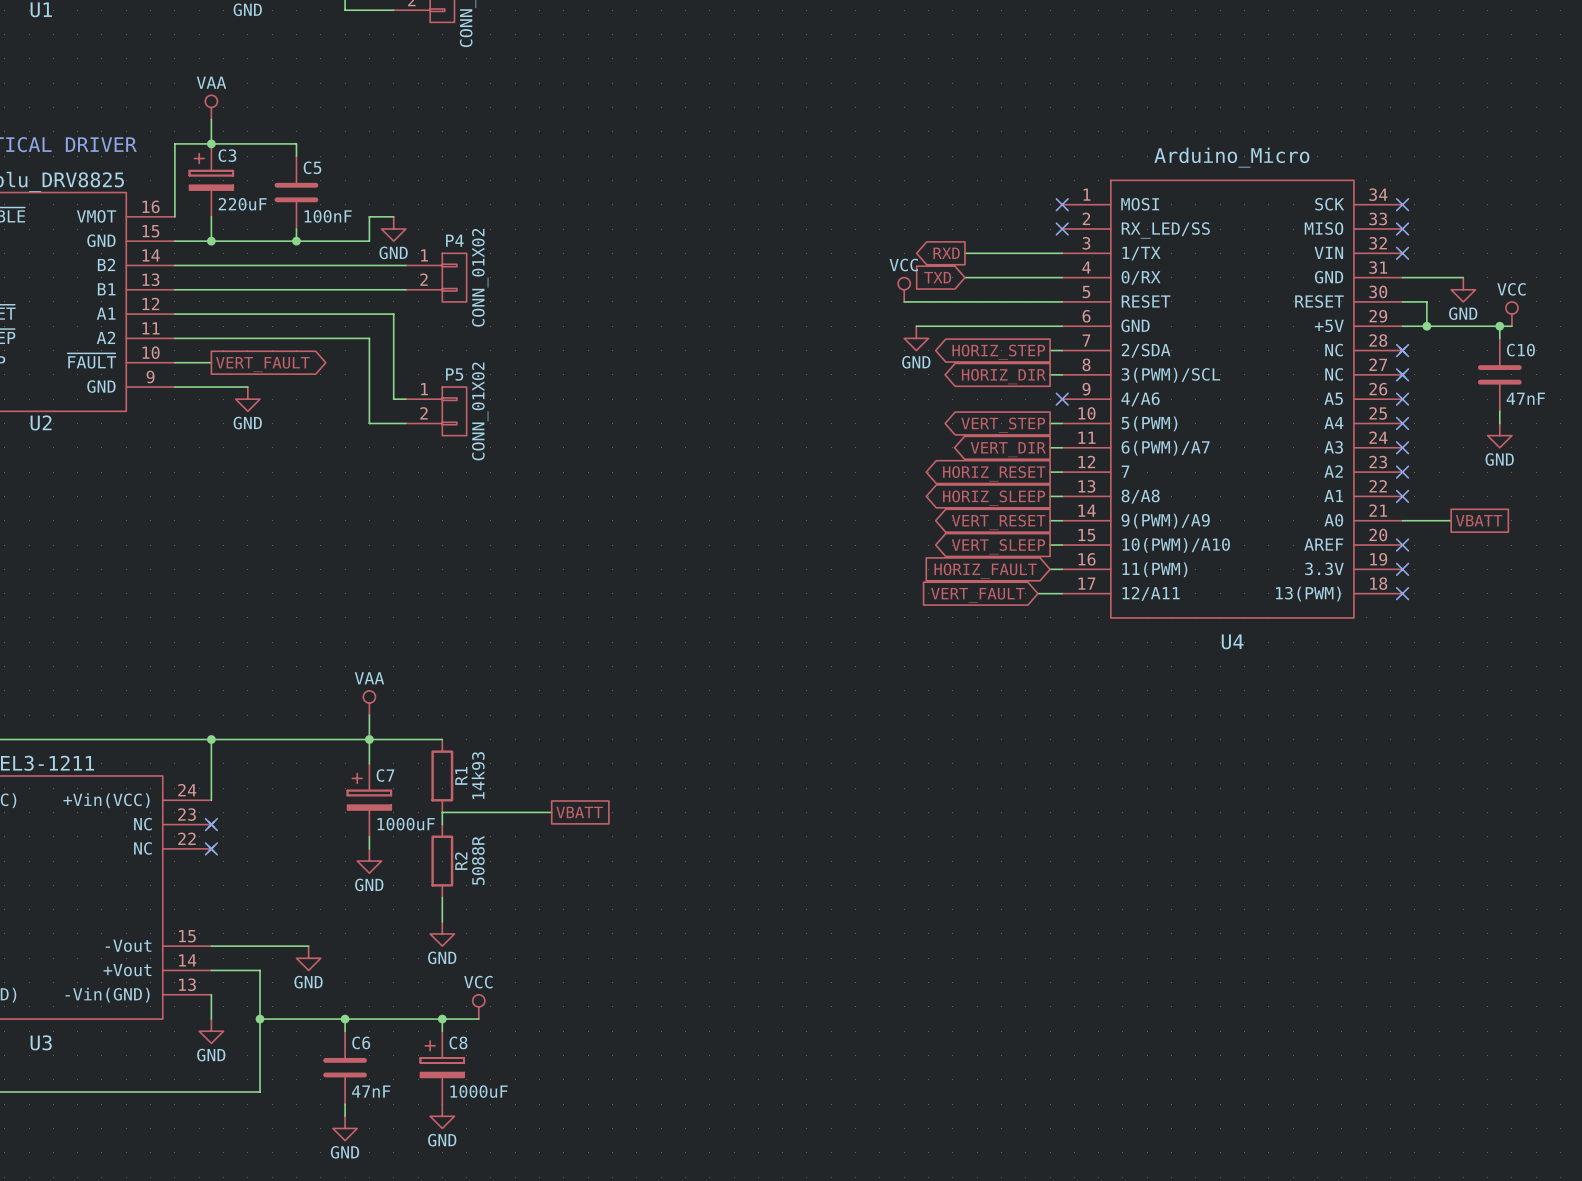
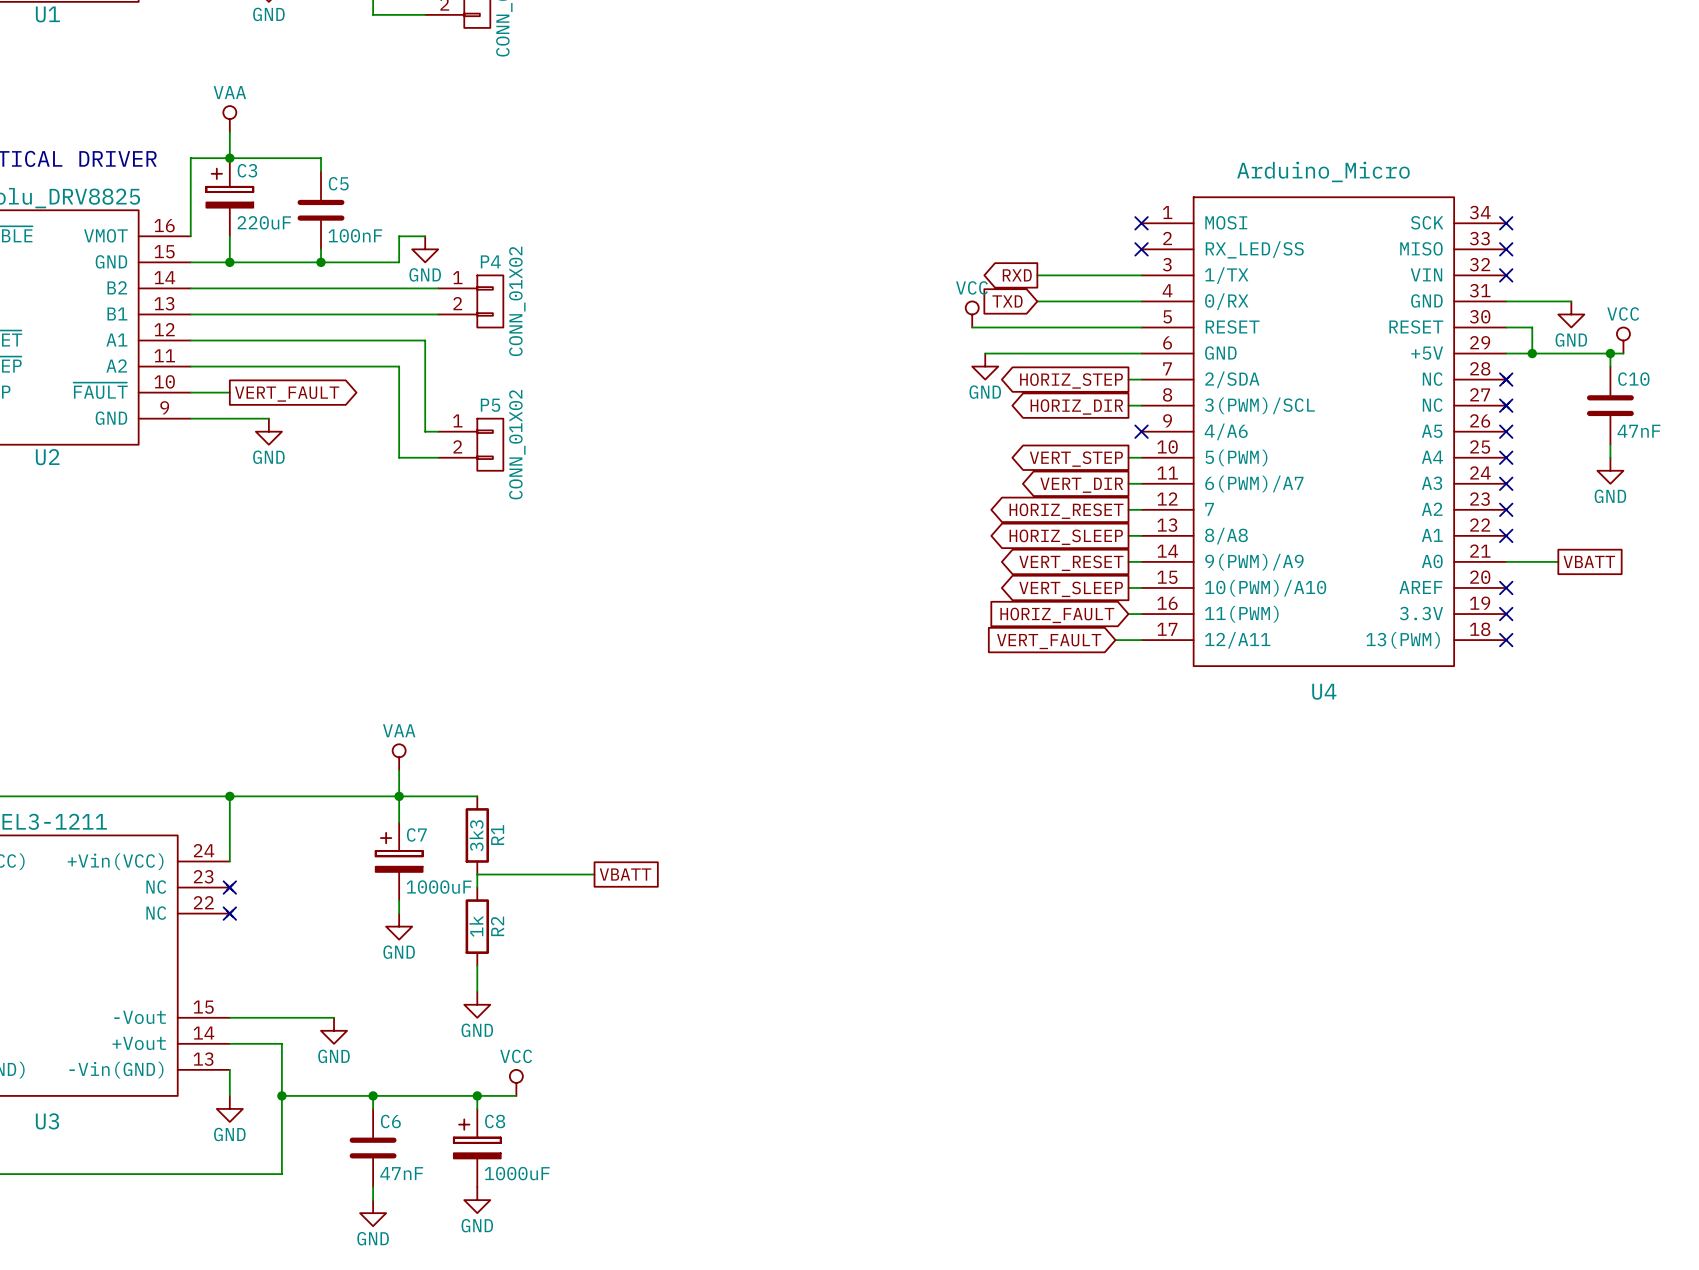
R1 value: 14k93 (478, 775) -> 3k3 (476, 835)
R2 value: 5088R (478, 860) -> 1k (476, 926)

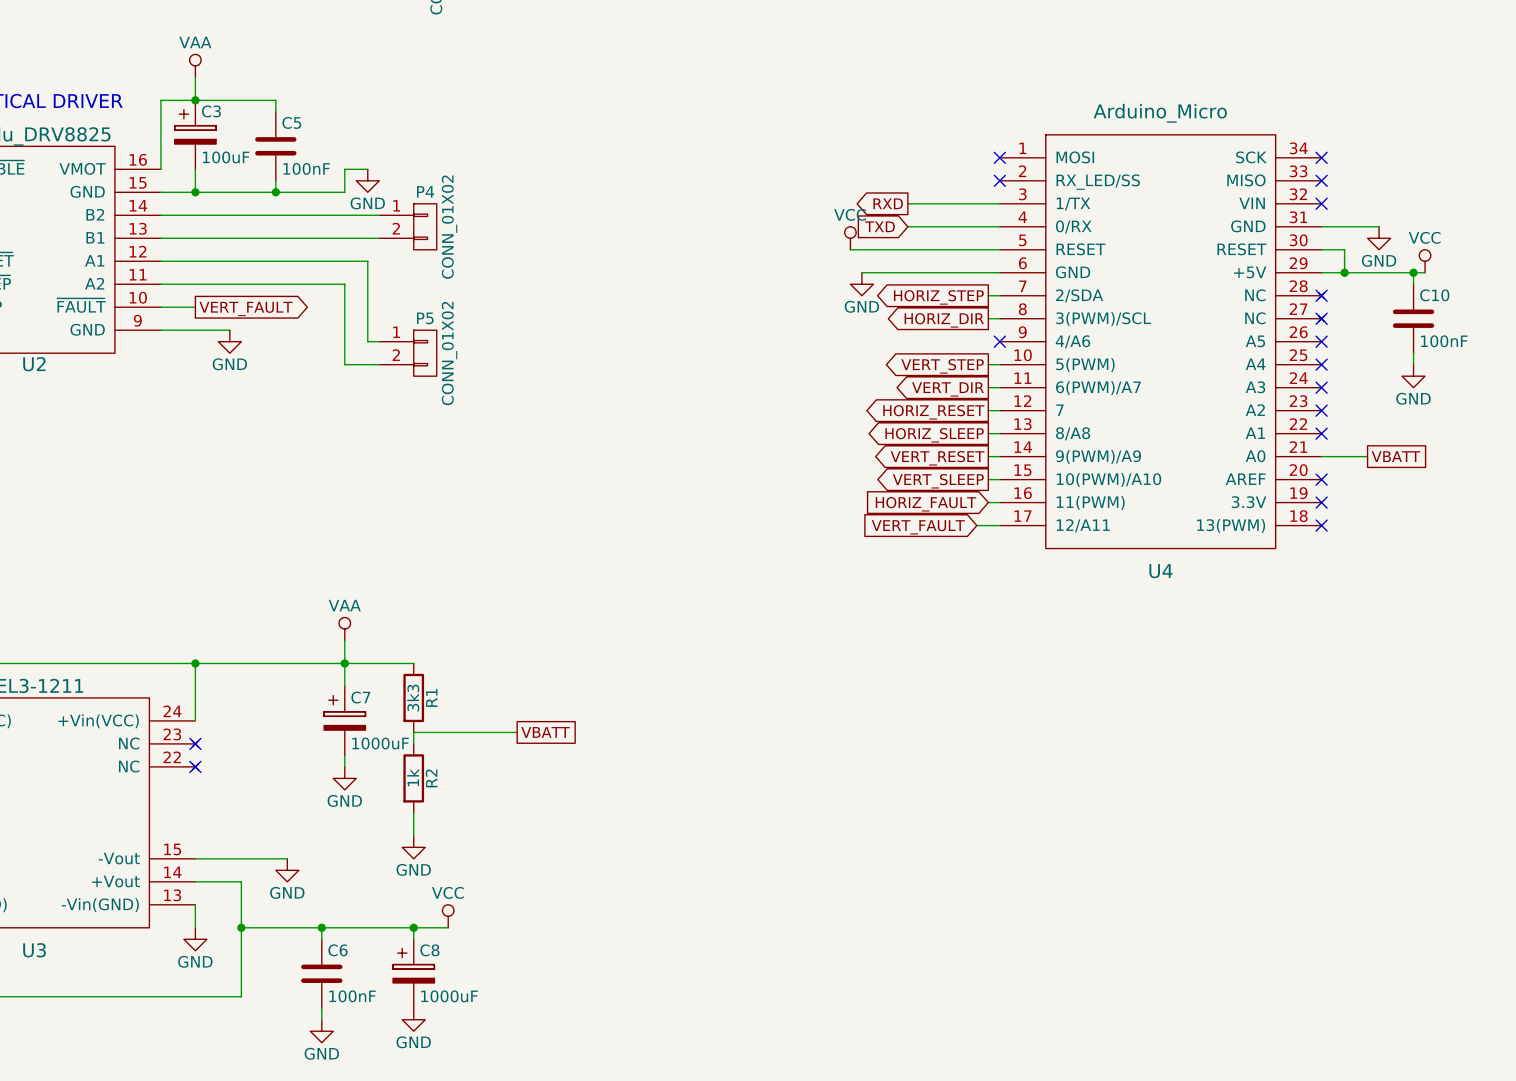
C3 value: 220uF (264, 222) -> 100uF (226, 157)
C10 value: 47nF (1638, 431) -> 100nF (1444, 341)
C6 value: 47nF (401, 1173) -> 100nF (352, 996)

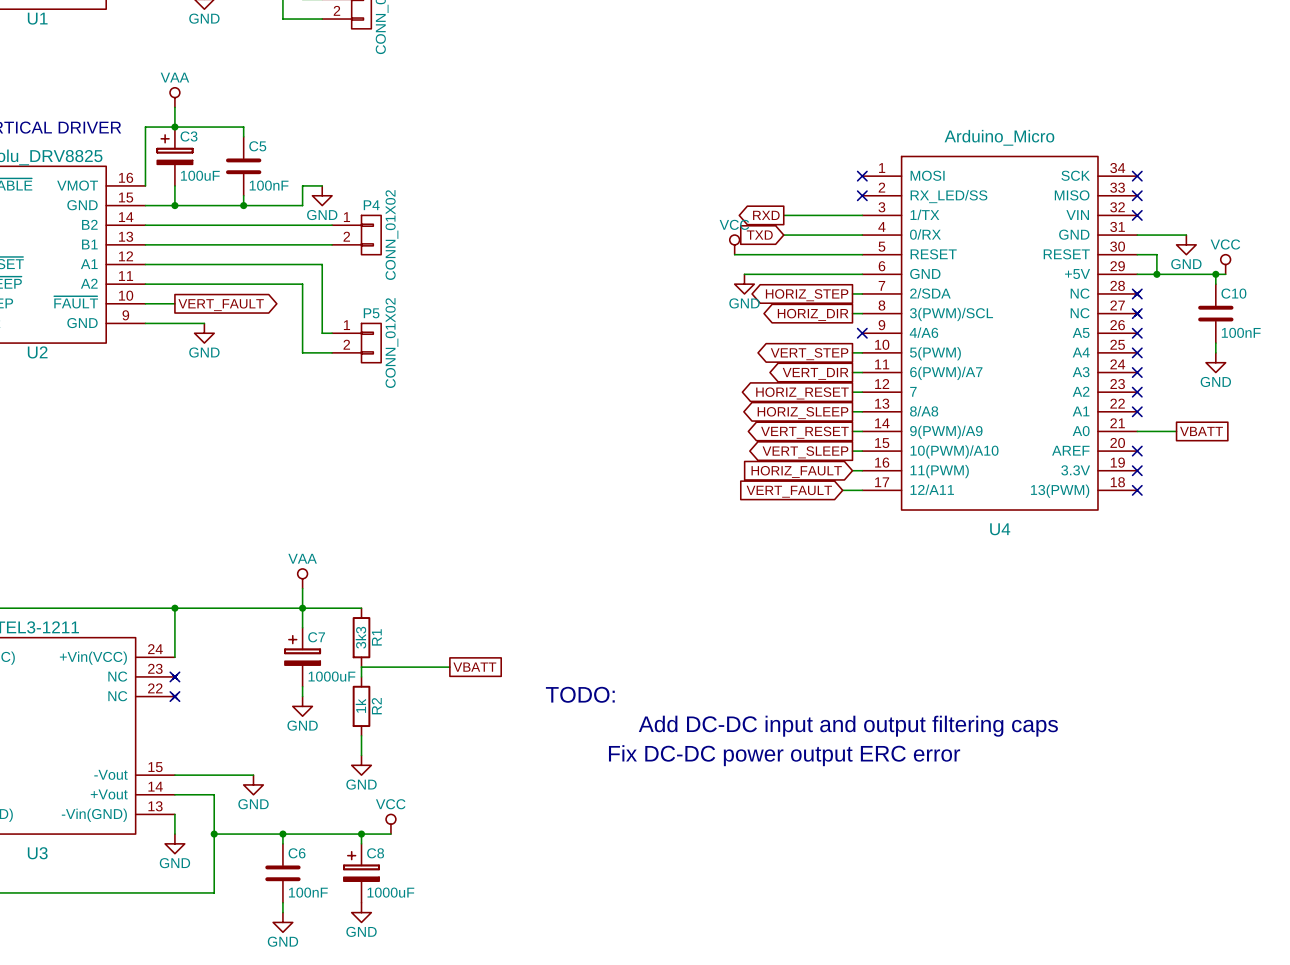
text: none -> TODO: (580, 694)
text: none -> Add DC-DC input and output filtering caps (848, 726)
text: none -> Fix DC-DC power output ERC error (784, 755)

